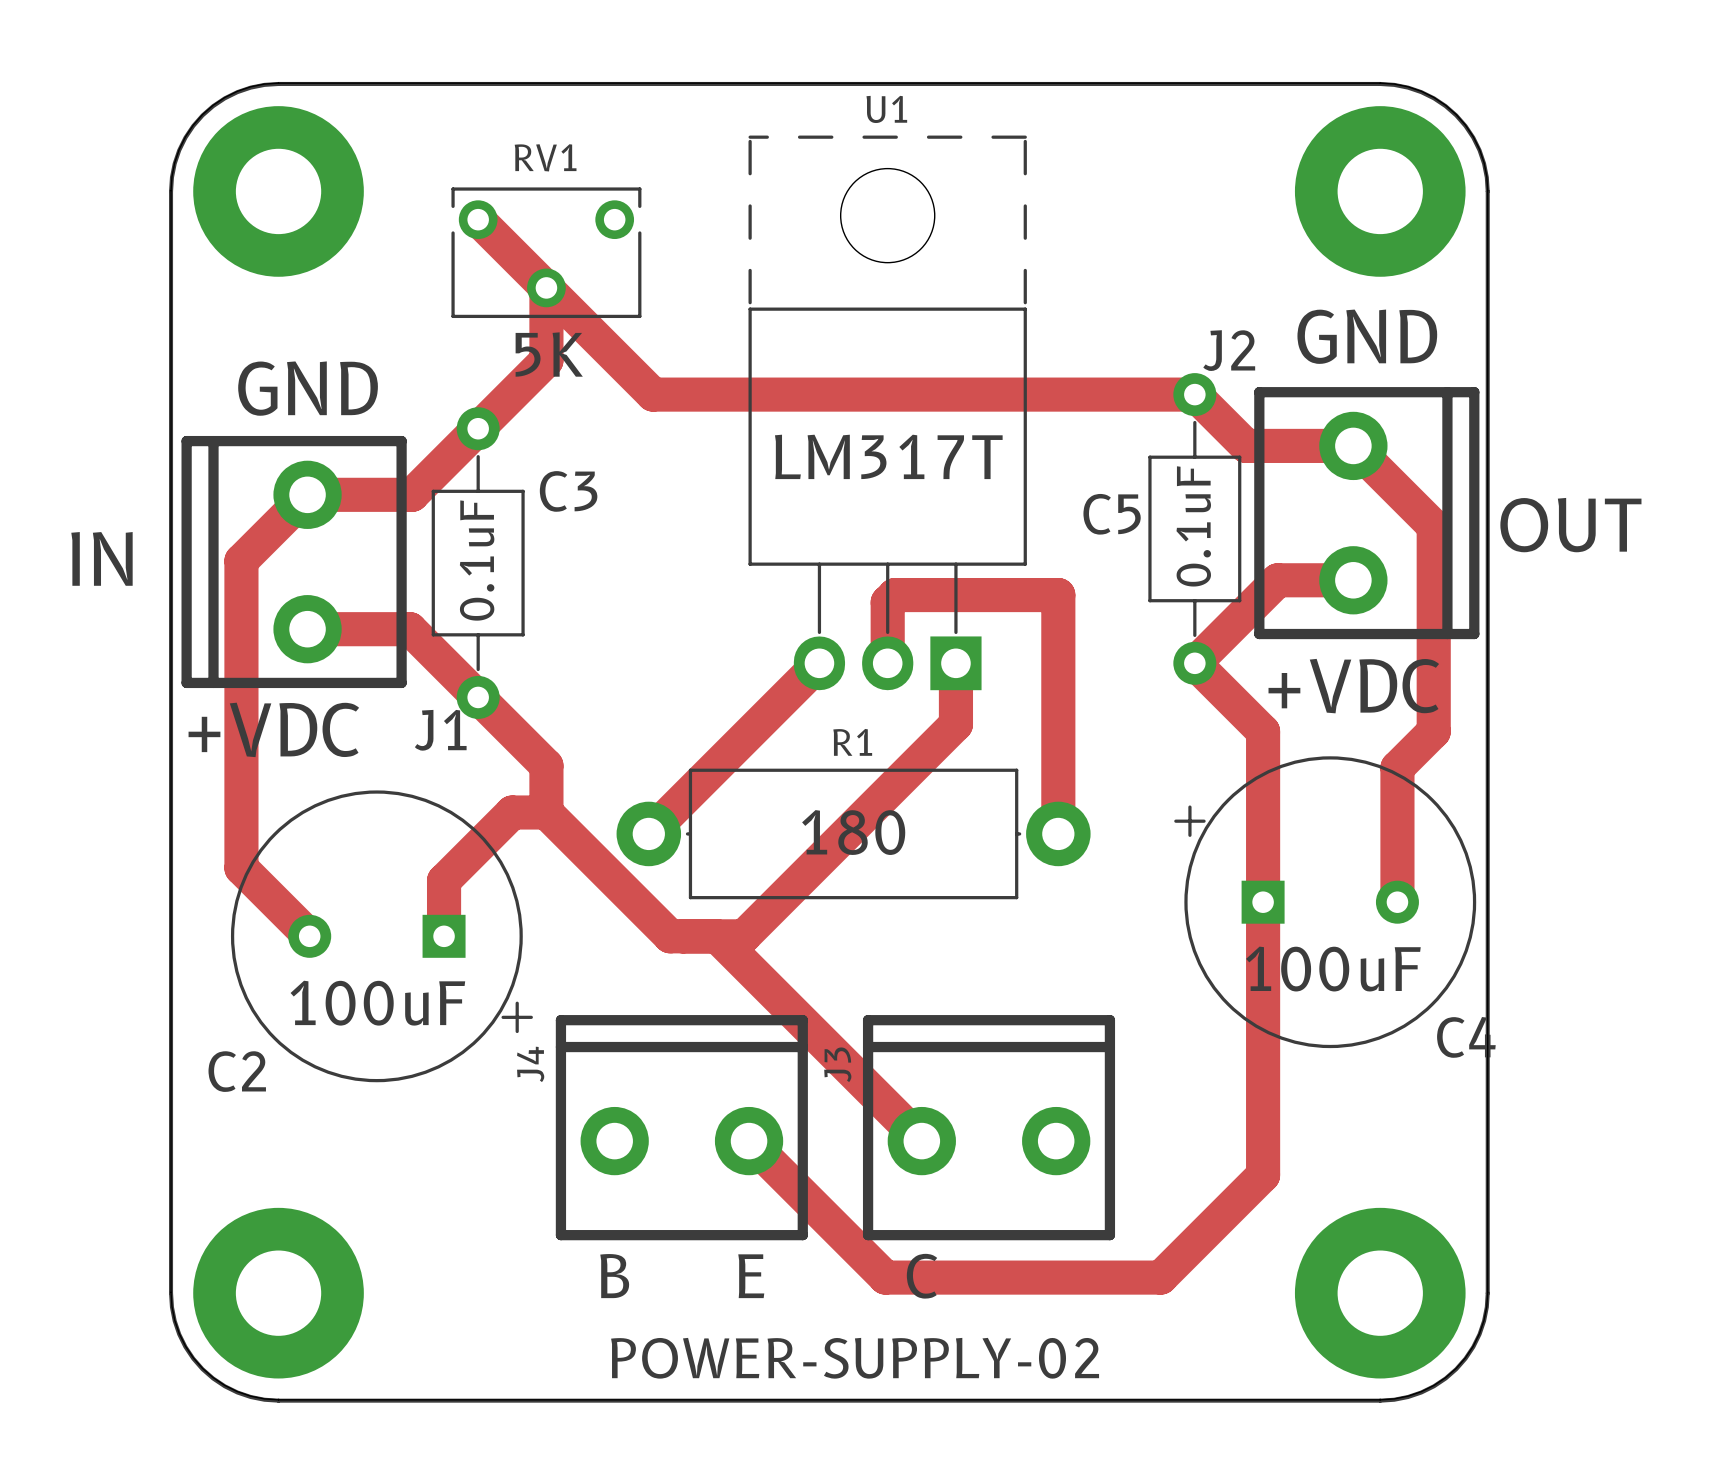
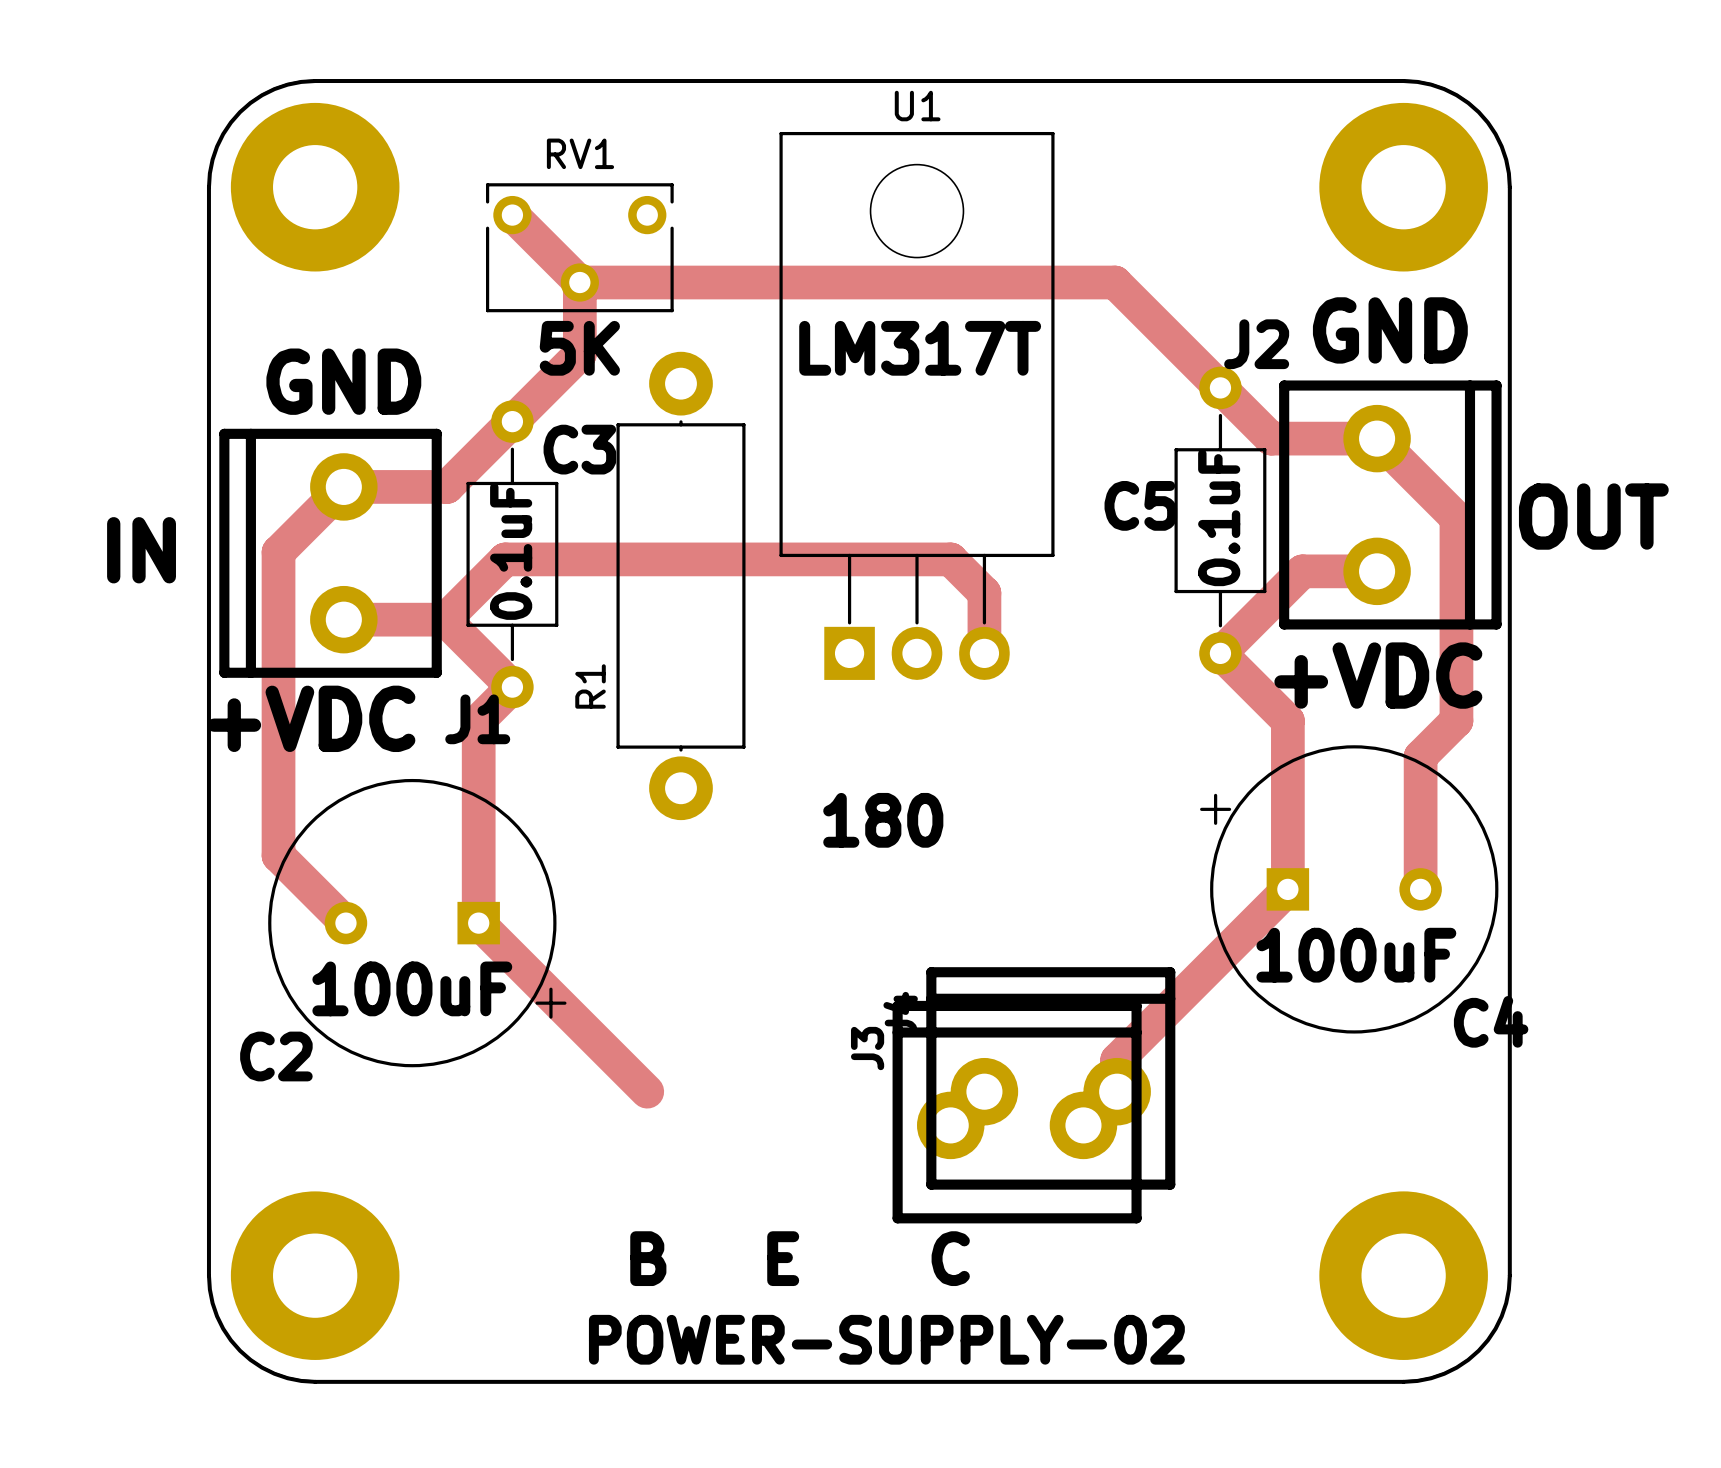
U1 footprint: [748, 135, 1027, 691] -> [779, 131, 1055, 680]
track: (546, 287) (653, 394) (1194, 394) -> (579, 282) (1115, 282) (1220, 387)
text position: LM317T (888, 456) -> LM317T (920, 348)
C3 name position: C3 (568, 491) -> C3 (579, 449)
track: (819, 663) (648, 833) -> none
track: (887, 663) (887, 602) (894, 595) (1058, 595) (1058, 833) -> none
track: (955, 663) (955, 724) (743, 936) (670, 936) (546, 812) -> (984, 653) (984, 593) (950, 559) (505, 559) (444, 619)
track: (478, 697) (546, 765) (546, 812) -> (512, 687) (478, 720) (478, 868)
R1 name position: R1 (852, 742) -> R1 (590, 686)
track: (546, 812) (512, 812) (444, 880) -> none
R1 rotation: 0° (853, 833) -> 90° clockwise (680, 585)
R1 position: (853, 833) -> (680, 585)
track: (1263, 902) (1263, 1175) (1160, 1277) (885, 1277) (749, 1141) -> (1287, 889) (1117, 1060) (1117, 1091)
track: none -> (478, 923) (647, 1091)
track: (717, 936) (921, 1141) -> none
J4 position: (681, 1127) -> (1050, 1078)

